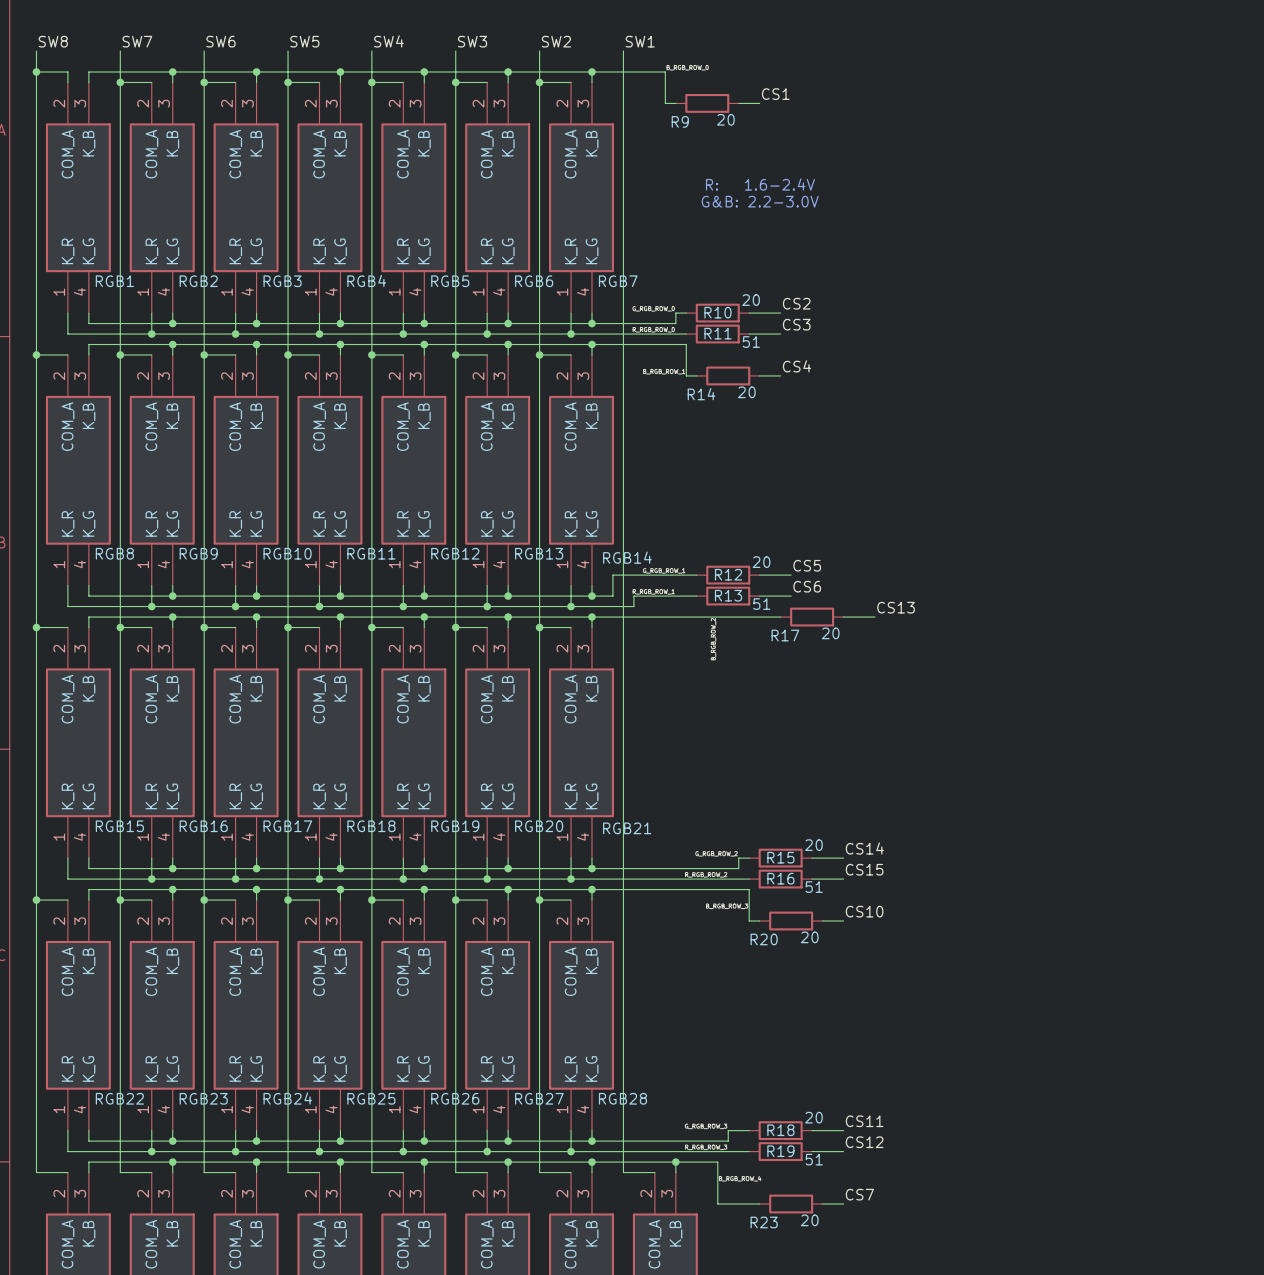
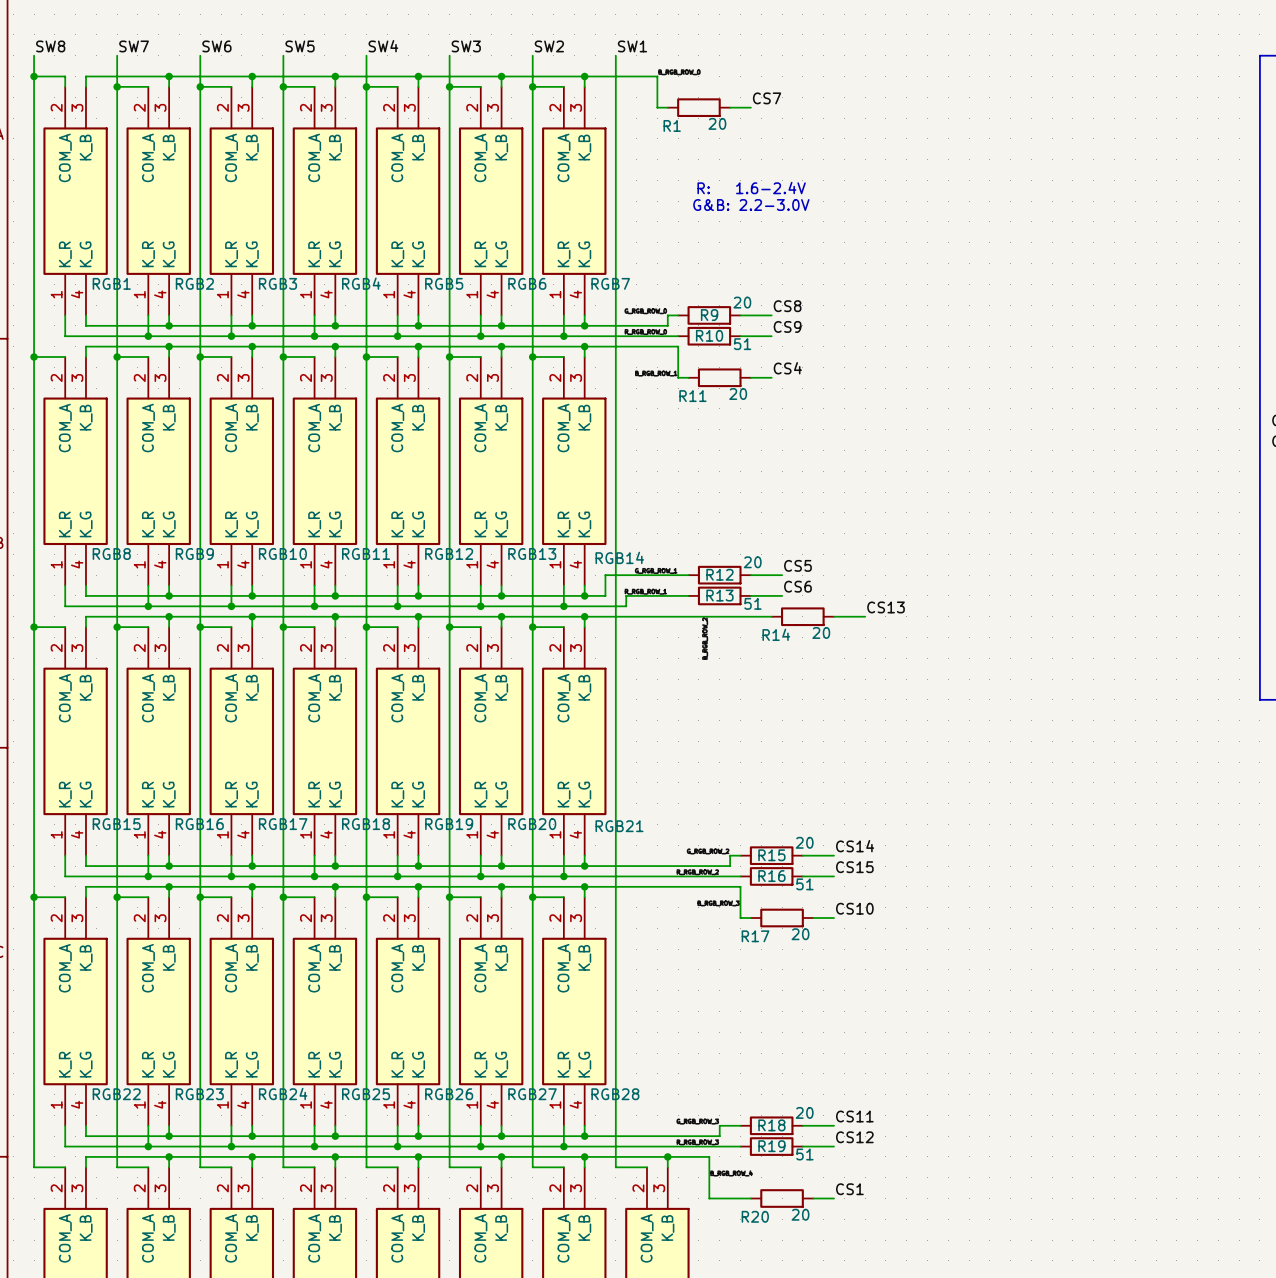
label: CS1 (775, 94) -> CS7 (767, 98)
R9 name: R9 (680, 121) -> R1 (672, 125)
label: CS2 (796, 303) -> CS8 (787, 306)
R10 name: R10 (718, 312) -> R9 (709, 315)
label: CS3 (796, 324) -> CS9 (787, 326)
R11 name: R11 (718, 333) -> R10 (709, 335)
R14 name: R14 (701, 394) -> R11 (692, 396)
R17 name: R17 (785, 635) -> R14 (776, 634)
R20 name: R20 (764, 939) -> R17 (755, 936)
label: CS7 (859, 1194) -> CS1 (849, 1189)
R23 name: R23 (764, 1222) -> R20 (755, 1216)

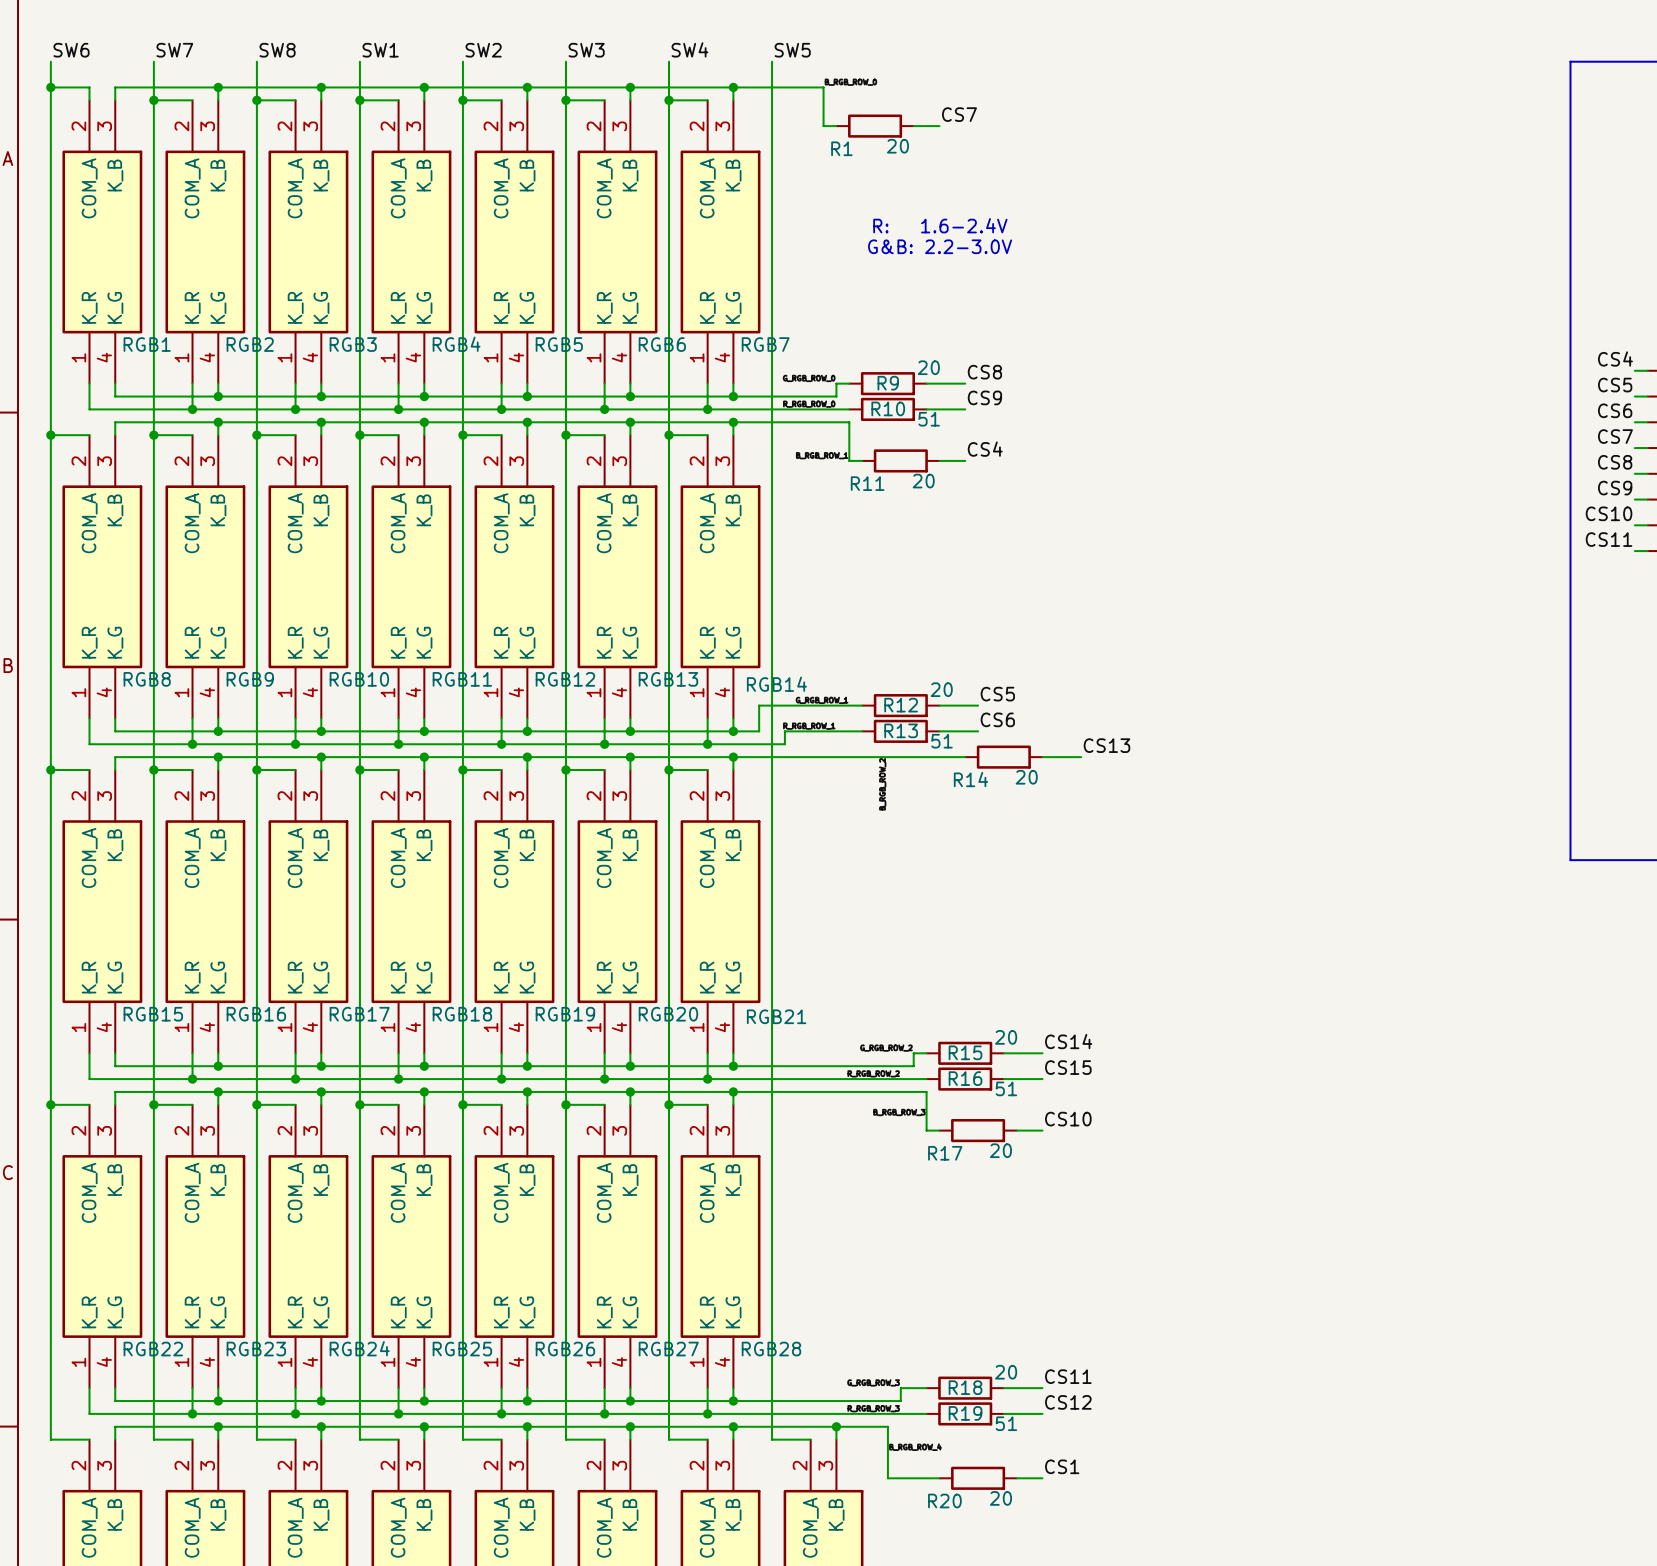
label: SW8 (50, 46) -> SW6 (71, 50)
label: SW6 (216, 46) -> SW8 (277, 50)
label: SW5 (300, 46) -> SW1 (380, 50)
label: SW4 (383, 46) -> SW2 (483, 50)
label: SW2 (549, 46) -> SW4 (689, 49)
label: SW1 (632, 46) -> SW5 (792, 50)

